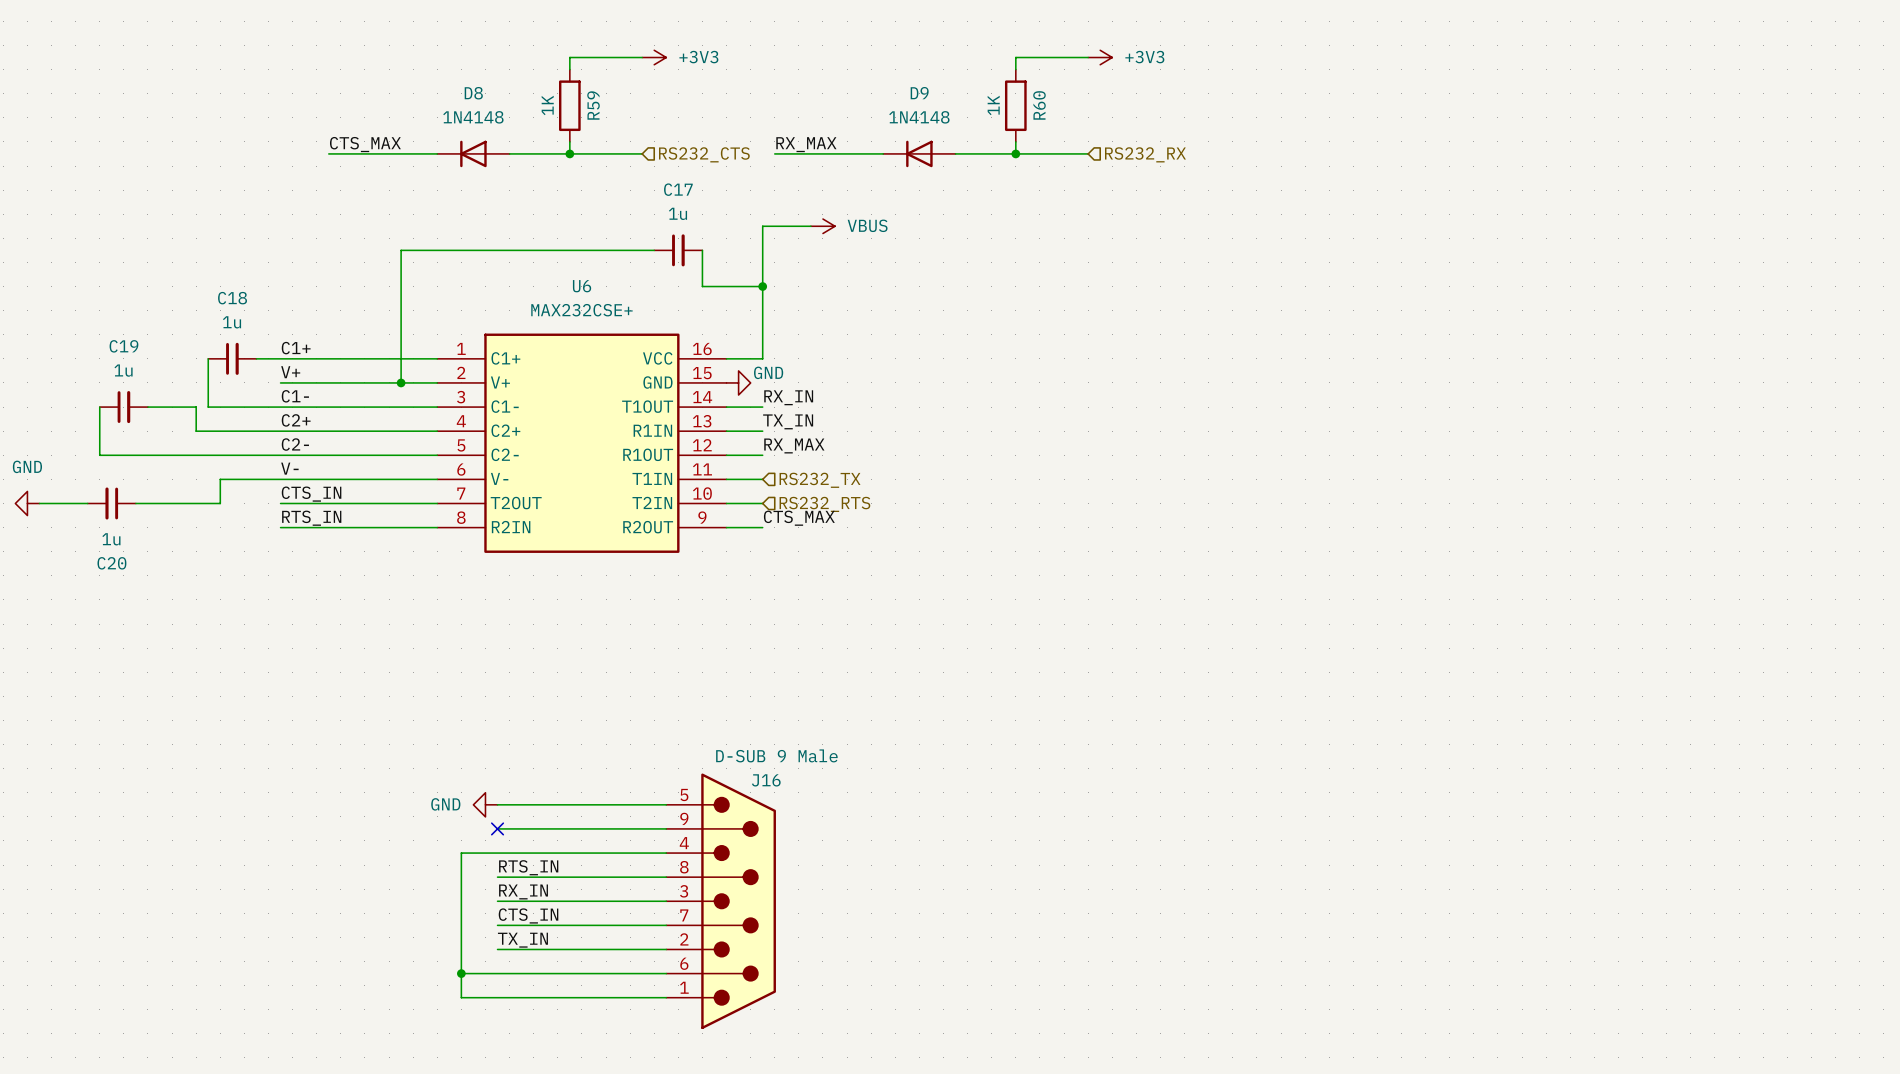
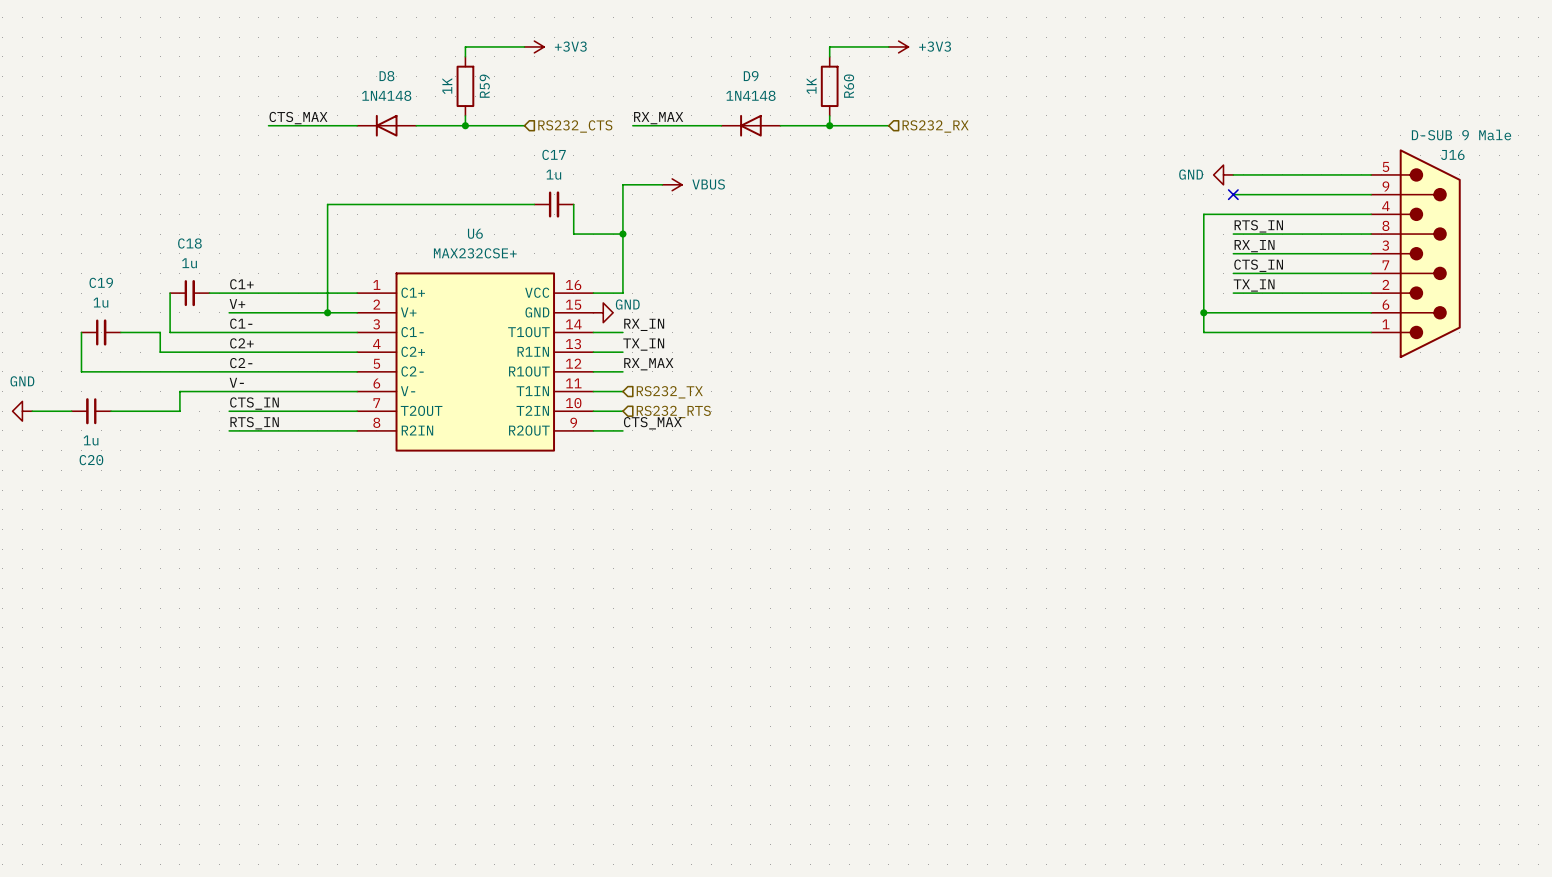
power symbol: none -> GND (1223, 174)
wire: none -> (1233, 174) (1371, 174)
wire: none -> (1233, 194) (1371, 194)
no-connect mark: none -> (1233, 194)
wire: none -> (1371, 214) (1203, 214) (1203, 332) (1371, 332)
label: none -> RTS_IN (1258, 226)
wire: none -> (1233, 234) (1371, 234)
label: none -> RX_IN (1254, 246)
wire: none -> (1233, 253) (1371, 253)
label: none -> CTS_IN (1258, 265)
wire: none -> (1233, 273) (1371, 273)
label: none -> TX_IN (1254, 285)
wire: none -> (1233, 293) (1371, 293)
wire: none -> (1203, 312) (1371, 312)
junction: none -> (1203, 312)
power symbol: GND (485, 804) -> none
wire: (497, 804) (666, 804) -> none
wire: (497, 828) (666, 828) -> none
no-connect mark: (497, 828) -> none
wire: (666, 853) (461, 853) (461, 997) (666, 997) -> none
label: RTS_IN (528, 867) -> none
wire: (497, 877) (666, 877) -> none
label: RX_IN (523, 891) -> none
wire: (497, 901) (666, 901) -> none
J16 position: (721, 901) -> (1415, 253)
label: CTS_IN (528, 915) -> none
wire: (497, 925) (666, 925) -> none
label: TX_IN (522, 940) -> none
wire: (497, 949) (666, 949) -> none
wire: (461, 973) (666, 973) -> none
junction: (461, 973) -> none

